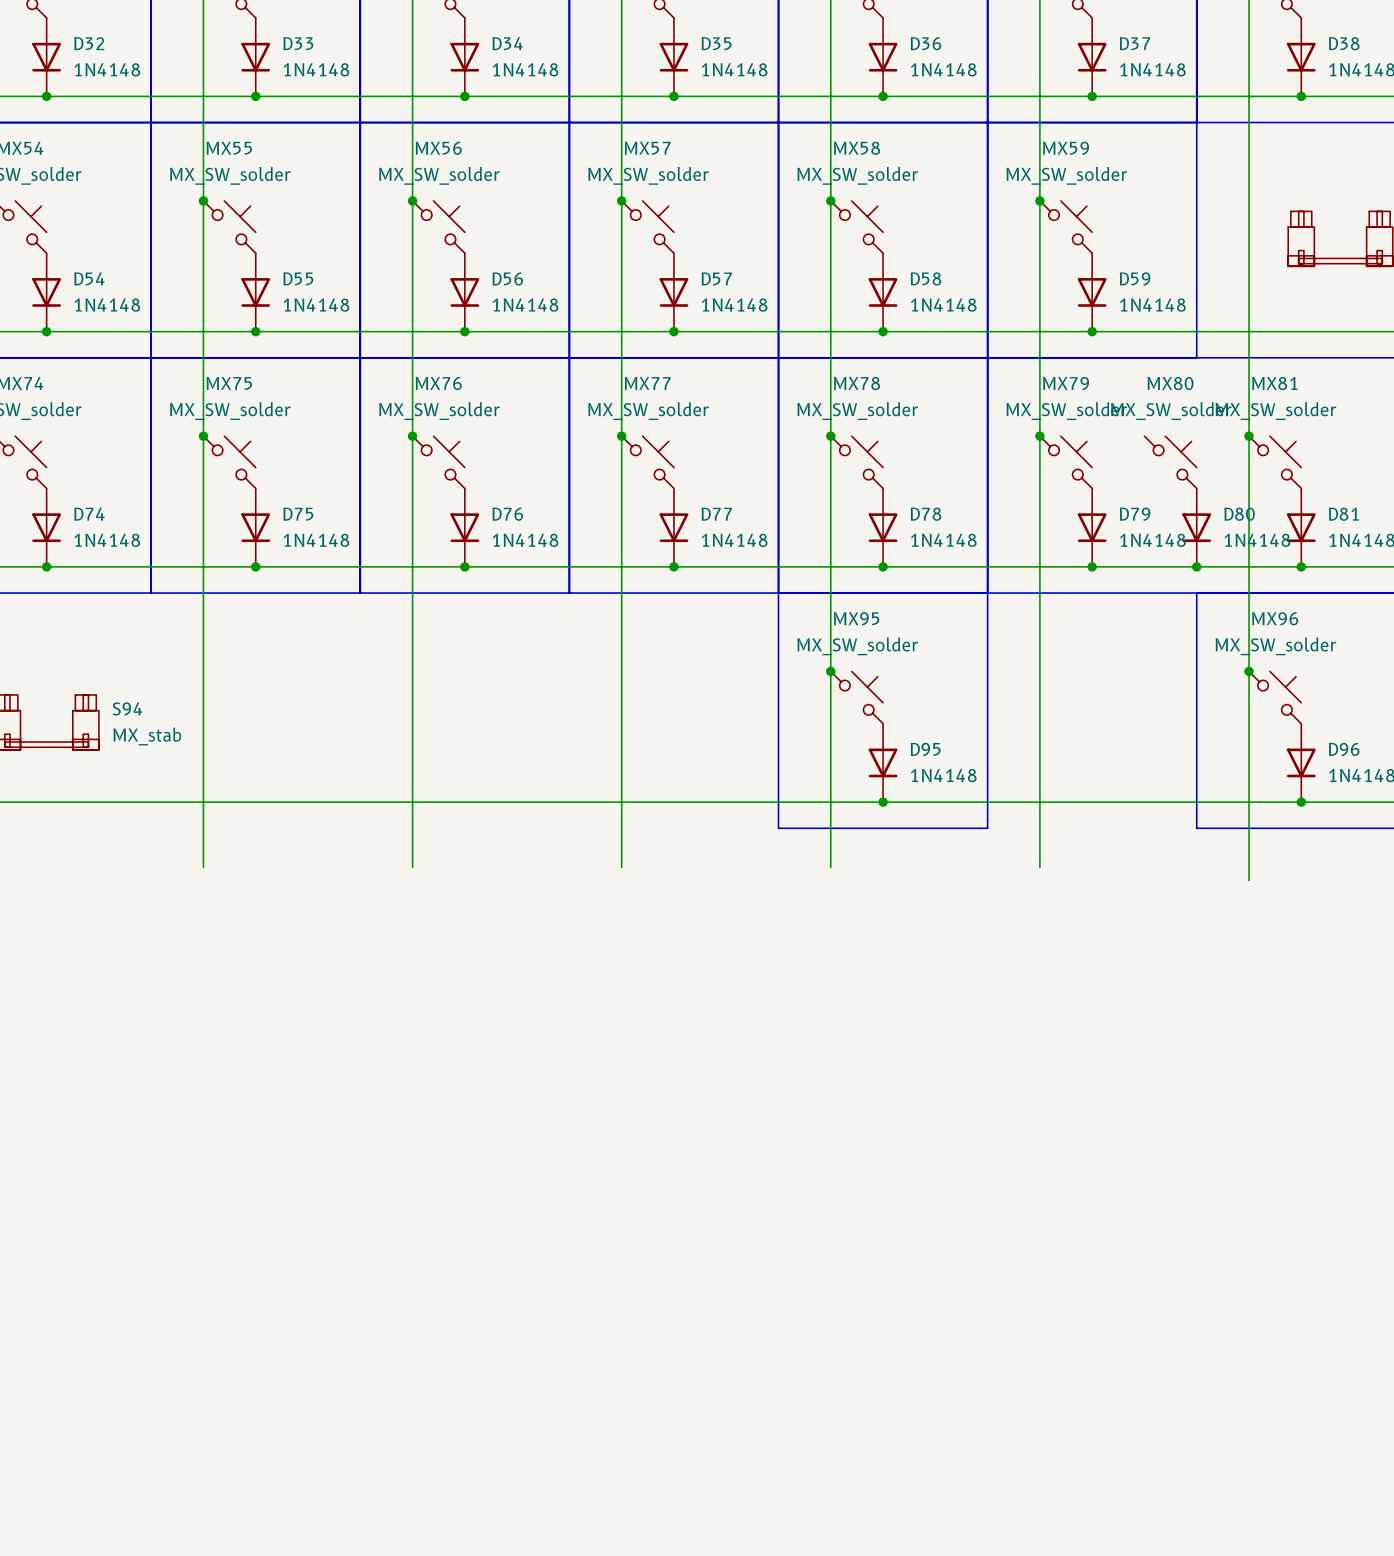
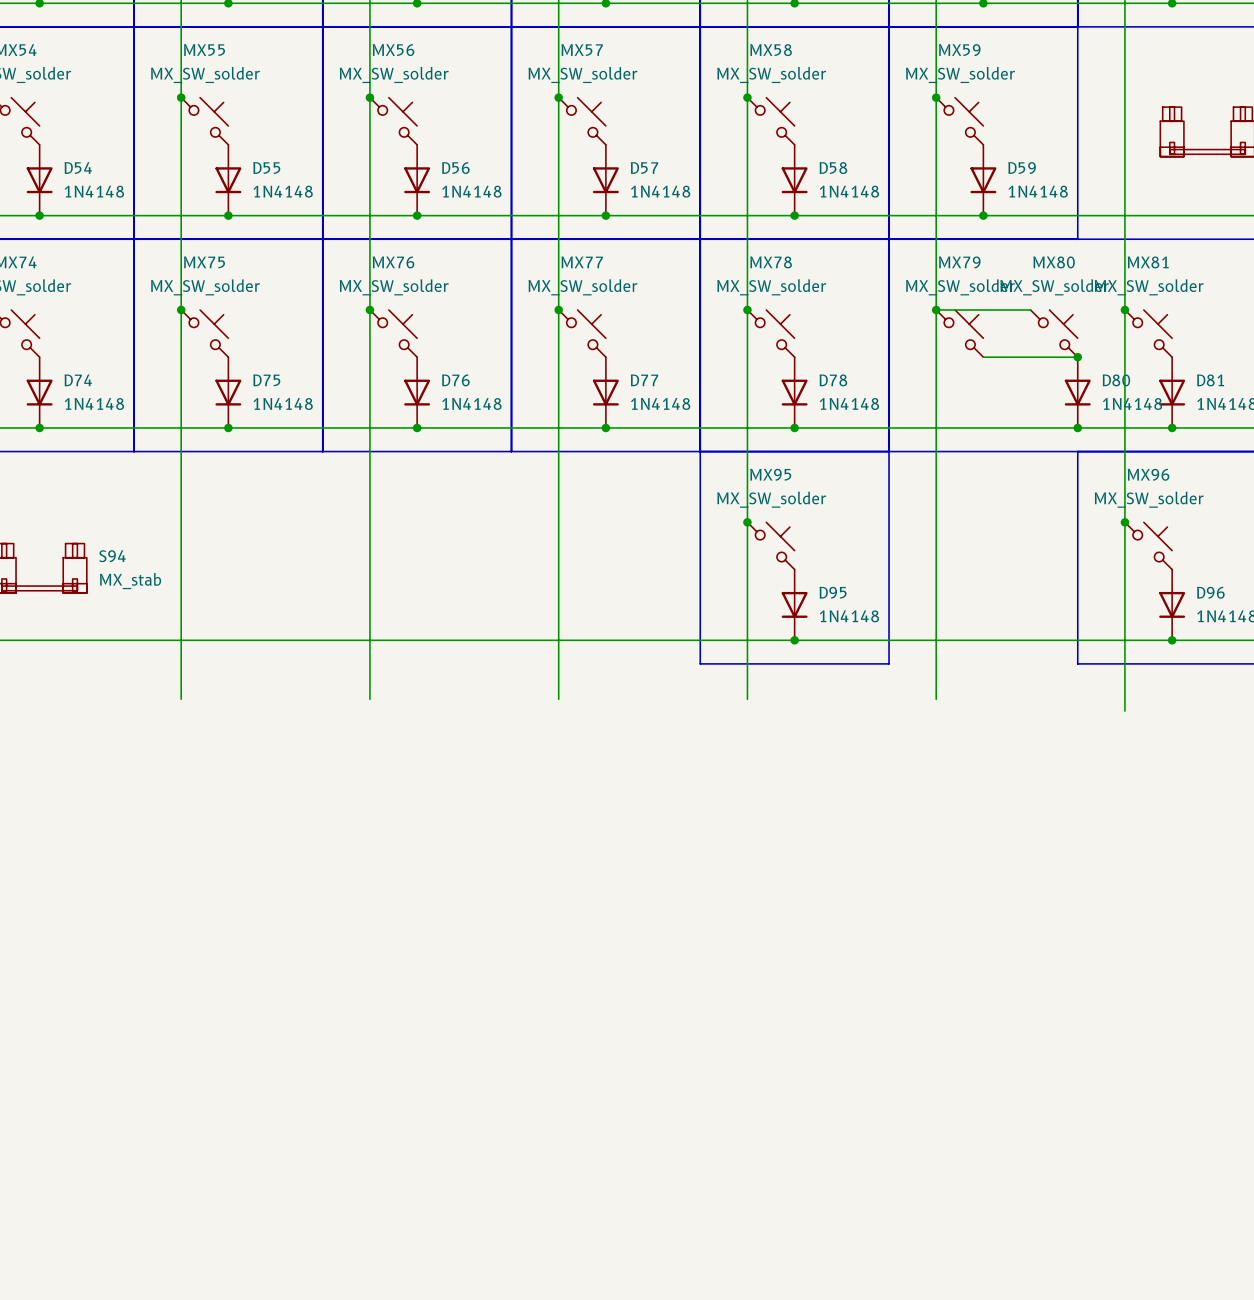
wire: none -> (936, 310) (1030, 310)
wire: none -> (983, 357) (1077, 357)
junction: none -> (1077, 357)
D79: 1N4148 (1092, 527) -> none
junction: (1092, 566) -> none

